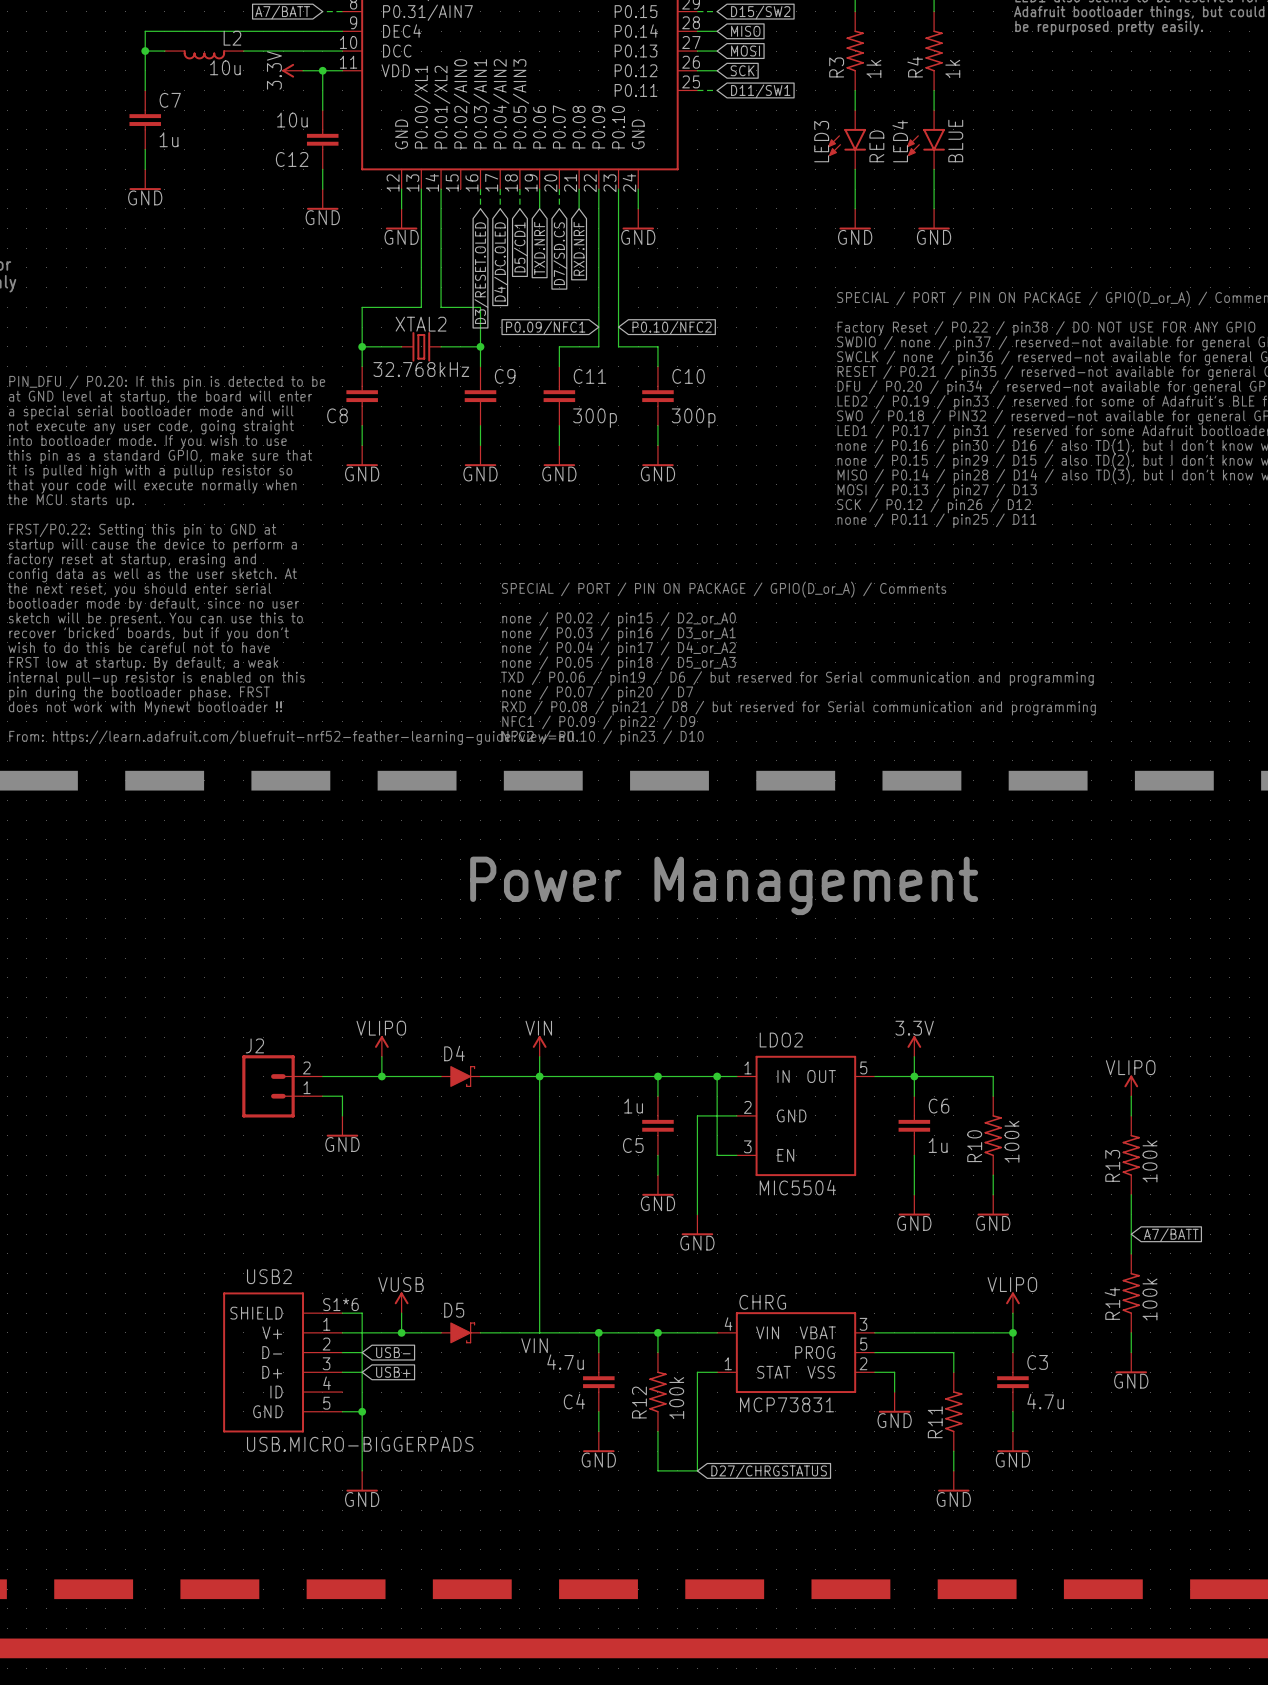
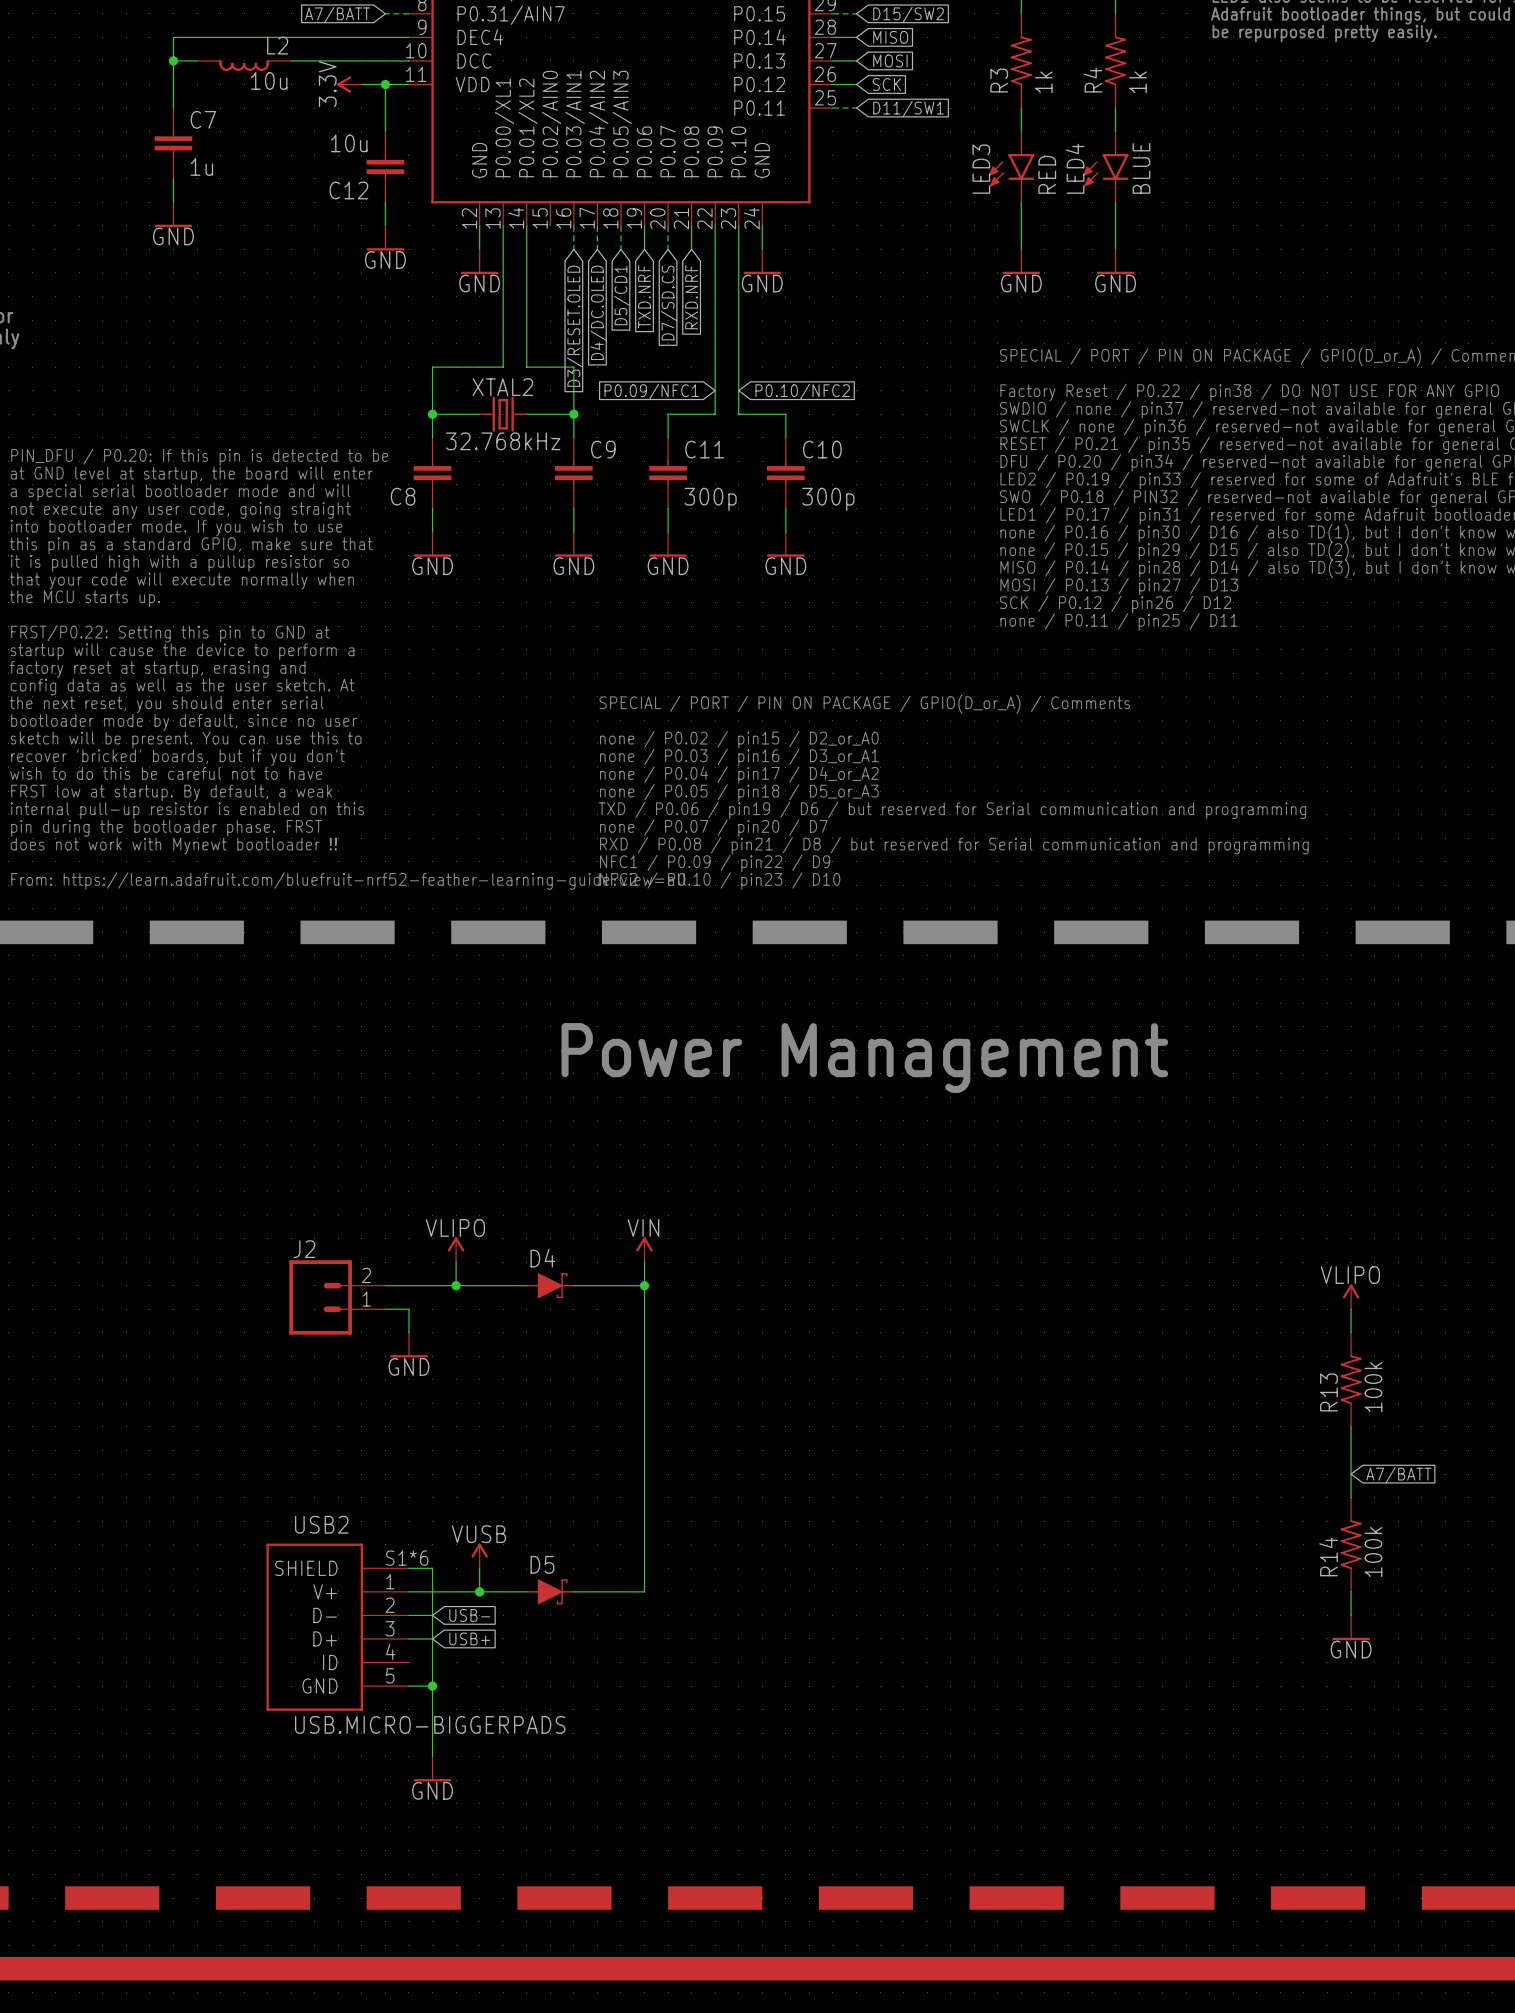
power symbol: 3.3V (914, 1046) -> none
wire: (914, 1056) (914, 1096) -> none
wire: (539, 1076) (736, 1076) -> none
wire: (657, 1076) (657, 1096) -> none
junction: (657, 1076) -> none
wire: (717, 1076) (717, 1155) (736, 1155) -> none
junction: (717, 1076) -> none
wire: (874, 1076) (993, 1076) (993, 1096) -> none
junction: (914, 1076) -> none
wire: (736, 1115) (697, 1115) (697, 1214) -> none
LDO2: MIC5504 (805, 1115) -> none
C5: 1u (657, 1125) -> none
C6: 1u (914, 1125) -> none
R10: 100k (993, 1135) -> none
wire: (657, 1155) (657, 1175) -> none
wire: (914, 1155) (914, 1194) -> none
wire: (993, 1175) (993, 1194) -> none
power symbol: GND (657, 1185) -> none
power symbol: GND (914, 1205) -> none
power symbol: GND (993, 1205) -> none
power symbol: GND (697, 1224) -> none
power symbol: VLIPO (1012, 1302) -> none
wire: (1012, 1313) (1012, 1352) -> none
wire: (539, 1332) (717, 1332) -> none
wire: (598, 1332) (598, 1352) -> none
junction: (598, 1332) -> none
wire: (657, 1332) (657, 1352) -> none
junction: (657, 1332) -> none
wire: (874, 1332) (1012, 1332) -> none
junction: (1012, 1332) -> none
label: VIN (534, 1345) -> none
CHRG: MCP73831 (796, 1352) -> none
wire: (874, 1352) (953, 1352) (953, 1372) -> none
wire: (717, 1372) (697, 1372) (697, 1470) (657, 1470) (657, 1431) -> none
wire: (874, 1372) (894, 1372) (894, 1392) -> none
C4: 4.7u (598, 1382) -> none
C3: 4.7u (1012, 1382) -> none
R12: 100k (657, 1392) -> none
power symbol: GND (894, 1402) -> none
wire: (598, 1411) (598, 1431) -> none
R11: (953, 1411) -> none
wire: (1012, 1411) (1012, 1431) -> none
power symbol: GND (598, 1441) -> none
power symbol: GND (1012, 1441) -> none
wire: (953, 1451) (953, 1470) -> none
global label: D27/CHRGSTATUS (769, 1471) -> none
power symbol: GND (953, 1481) -> none

